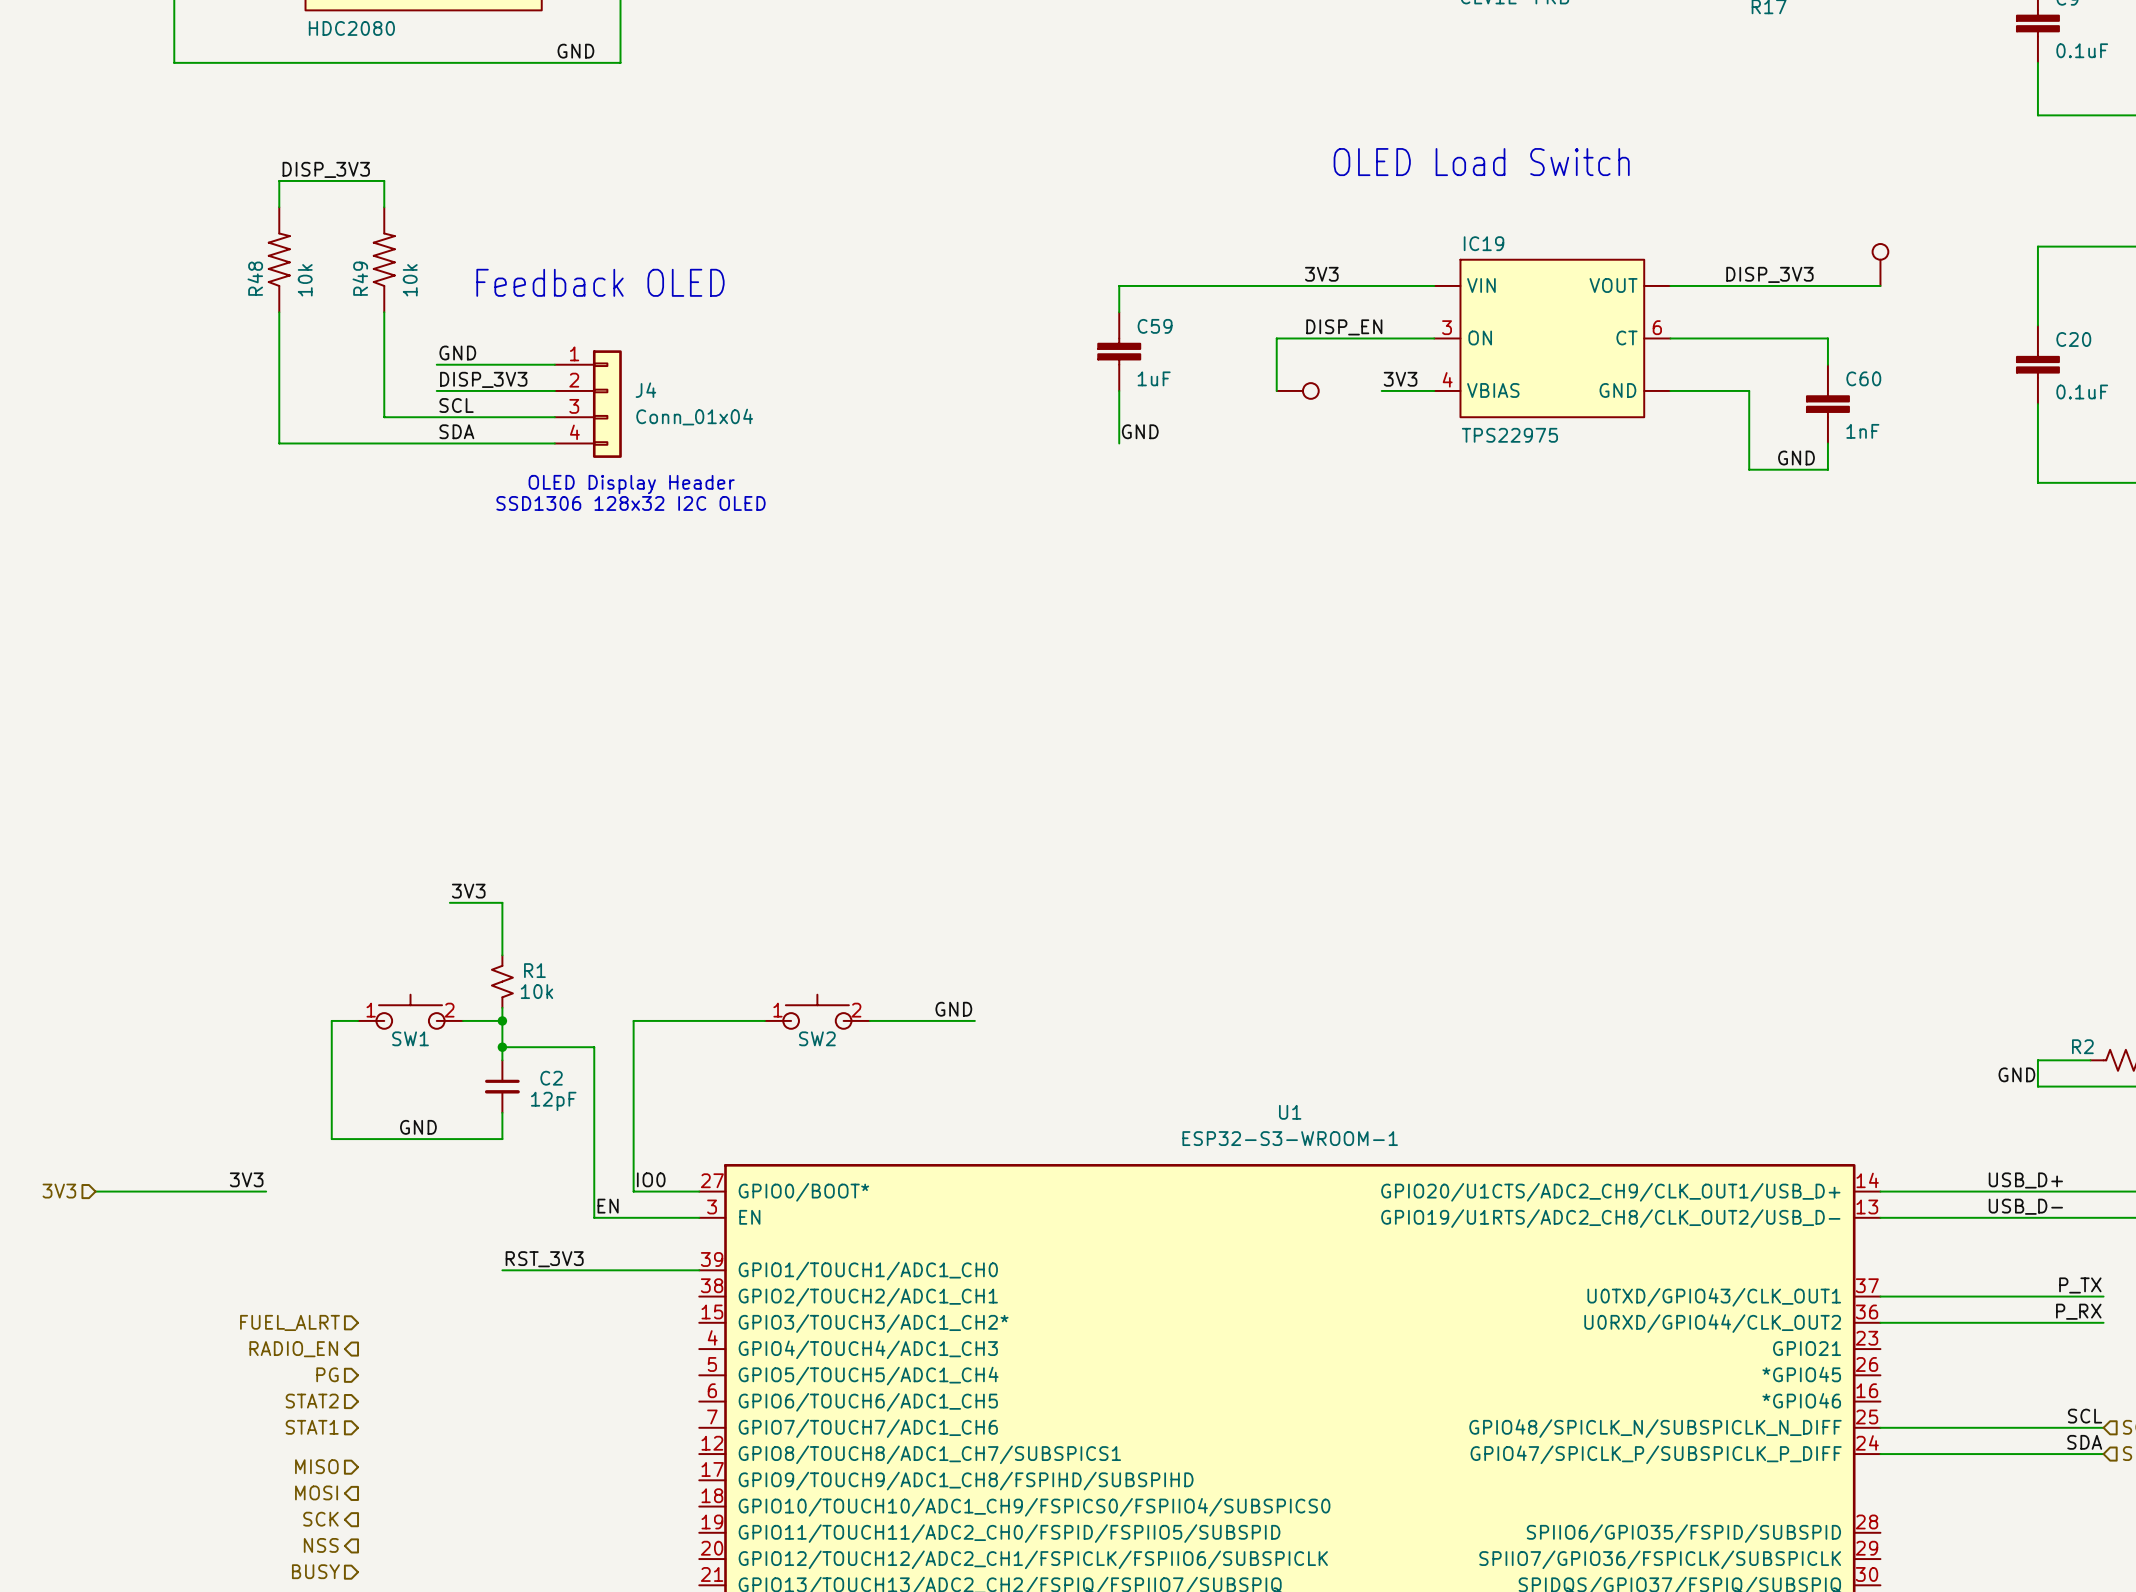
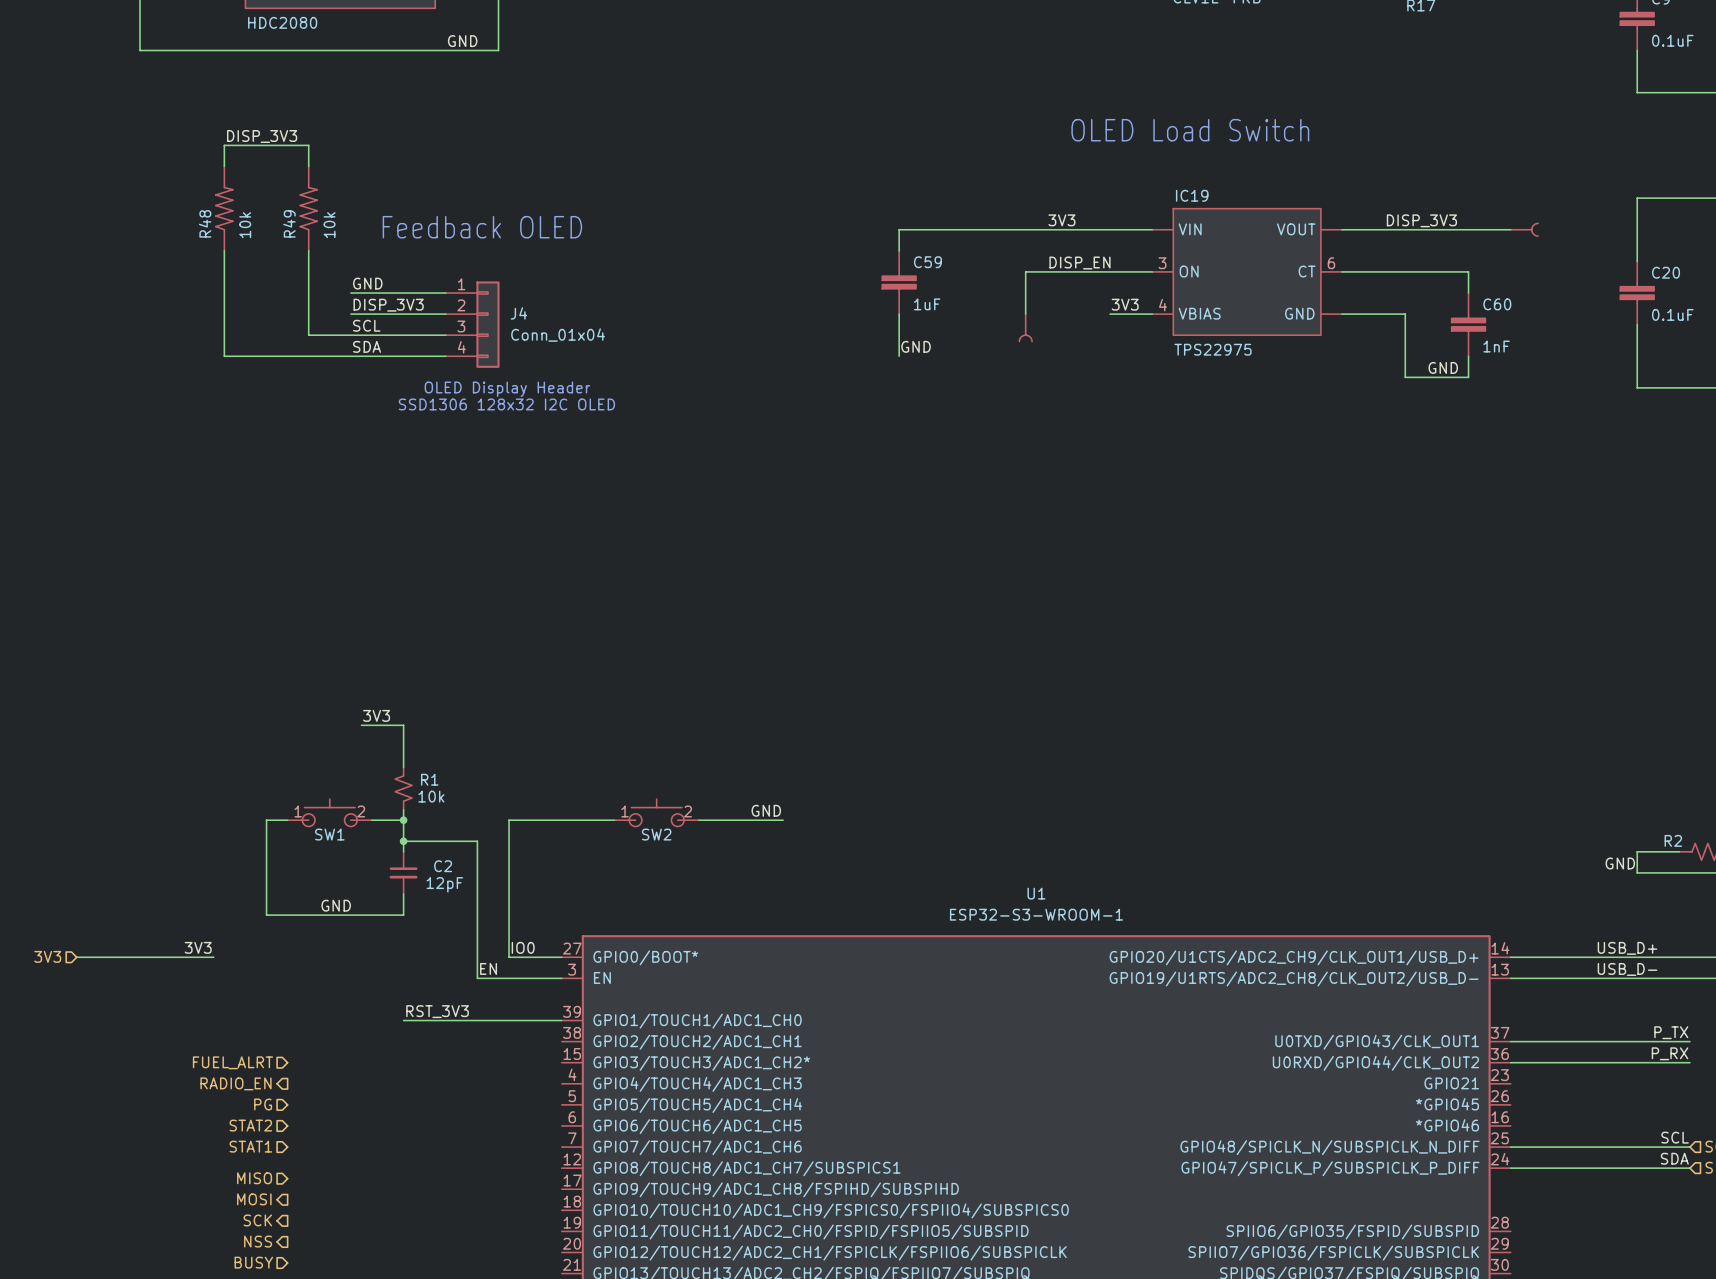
part: (1880, 264) -> none
part: none -> (1524, 229)
part: (1297, 390) -> none
part: none -> (1025, 327)

